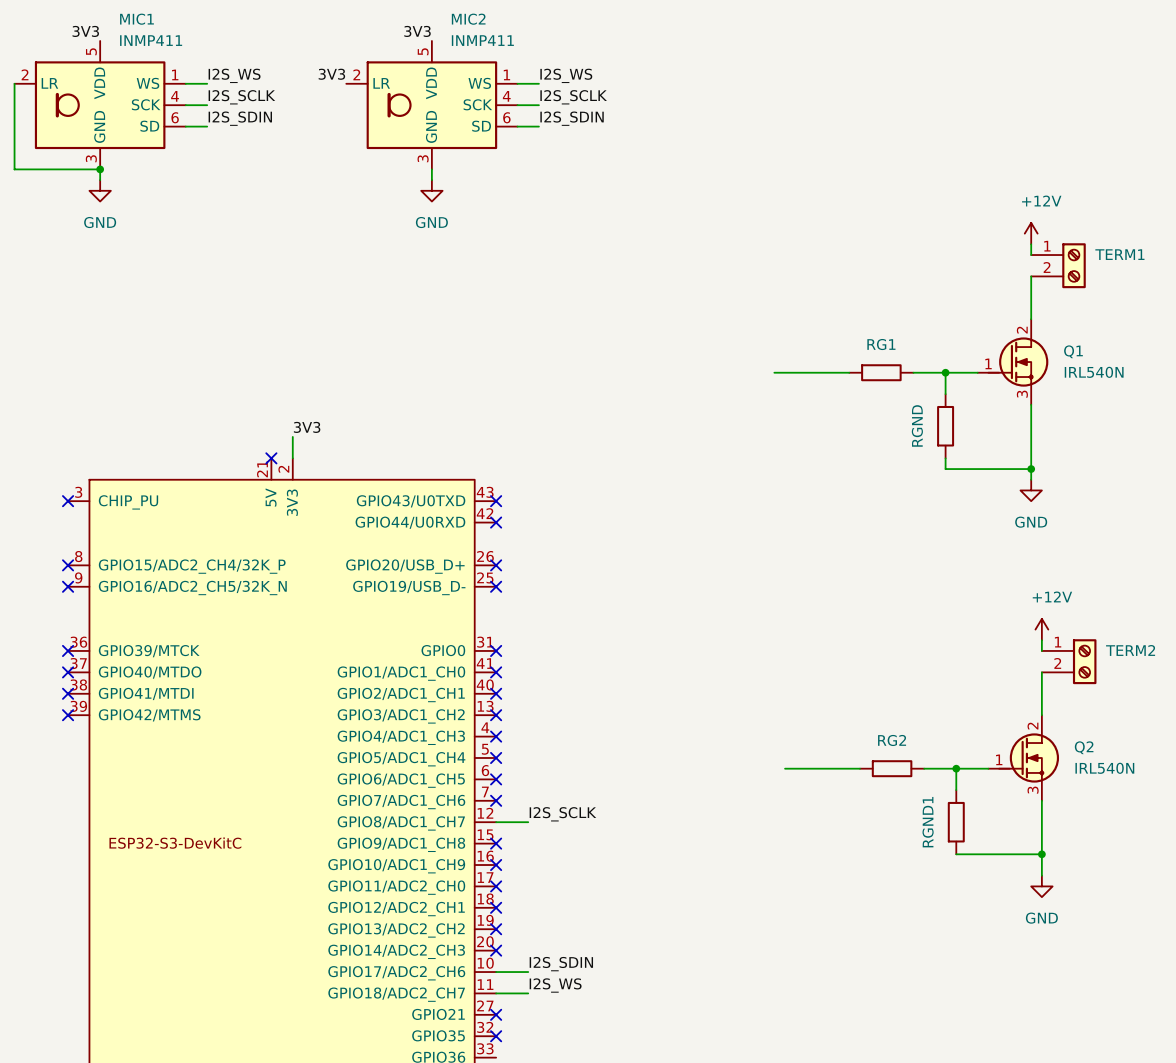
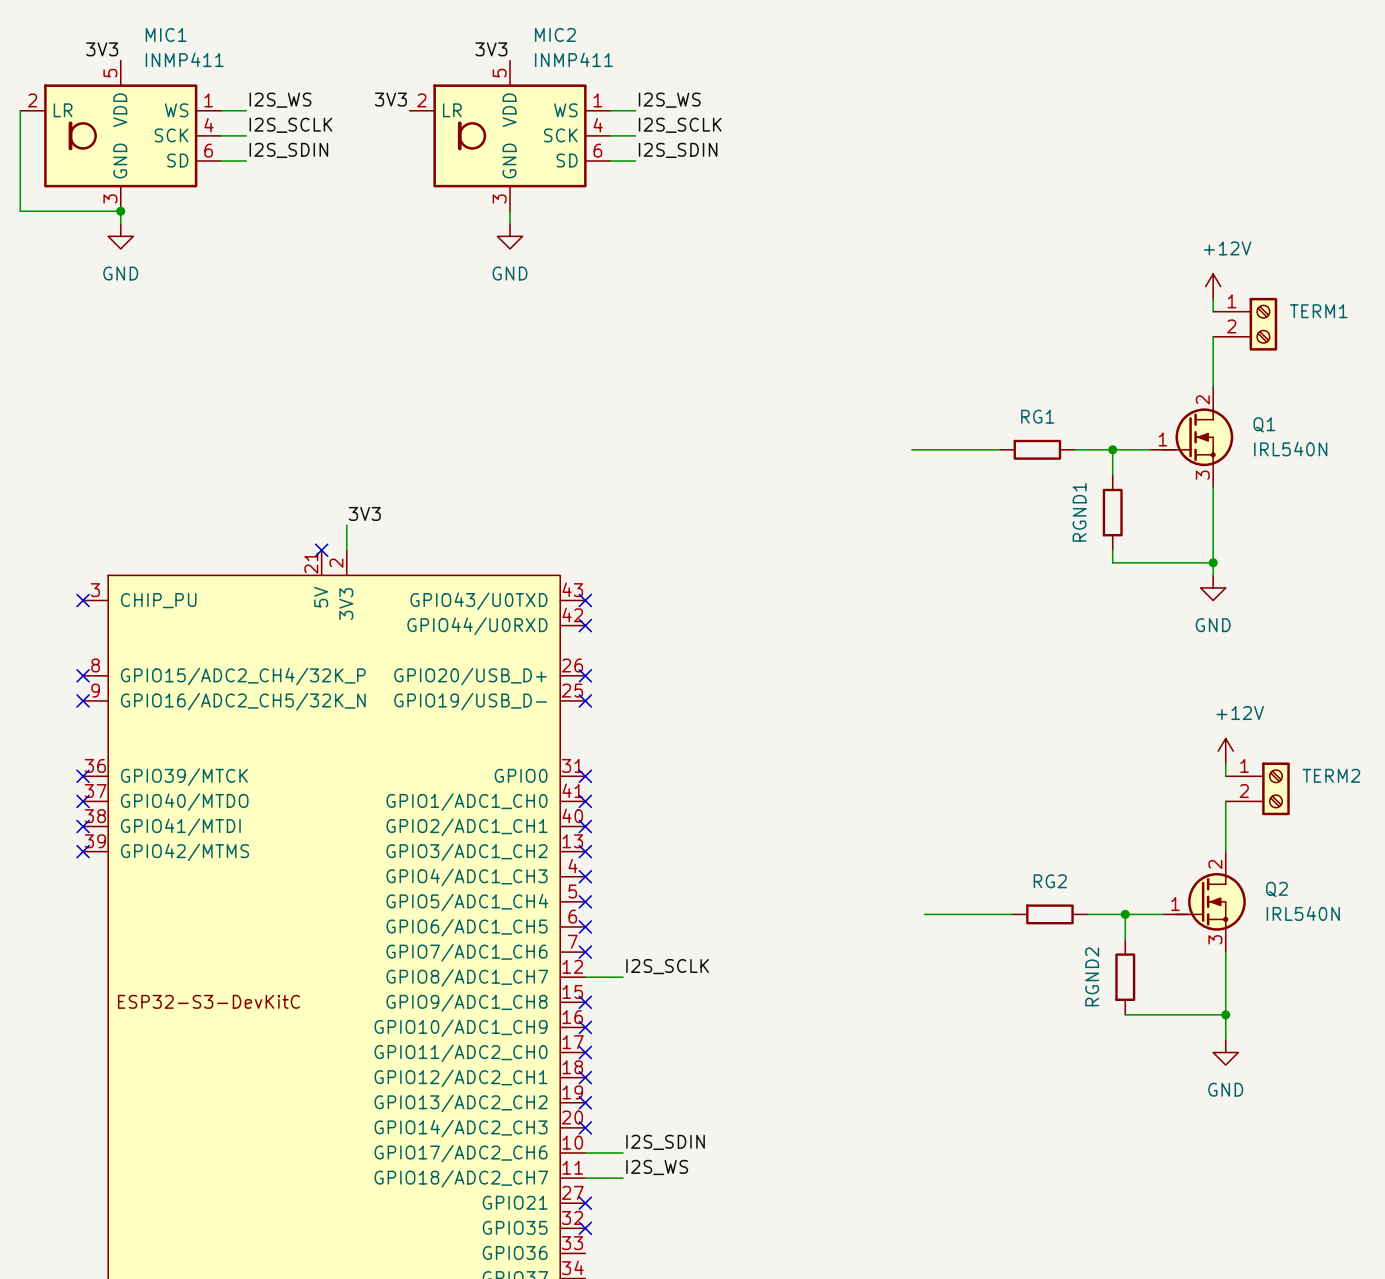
RGND name: RGND (917, 425) -> RGND1 (1079, 512)
RGND1 name: RGND1 (928, 822) -> RGND2 (1092, 976)

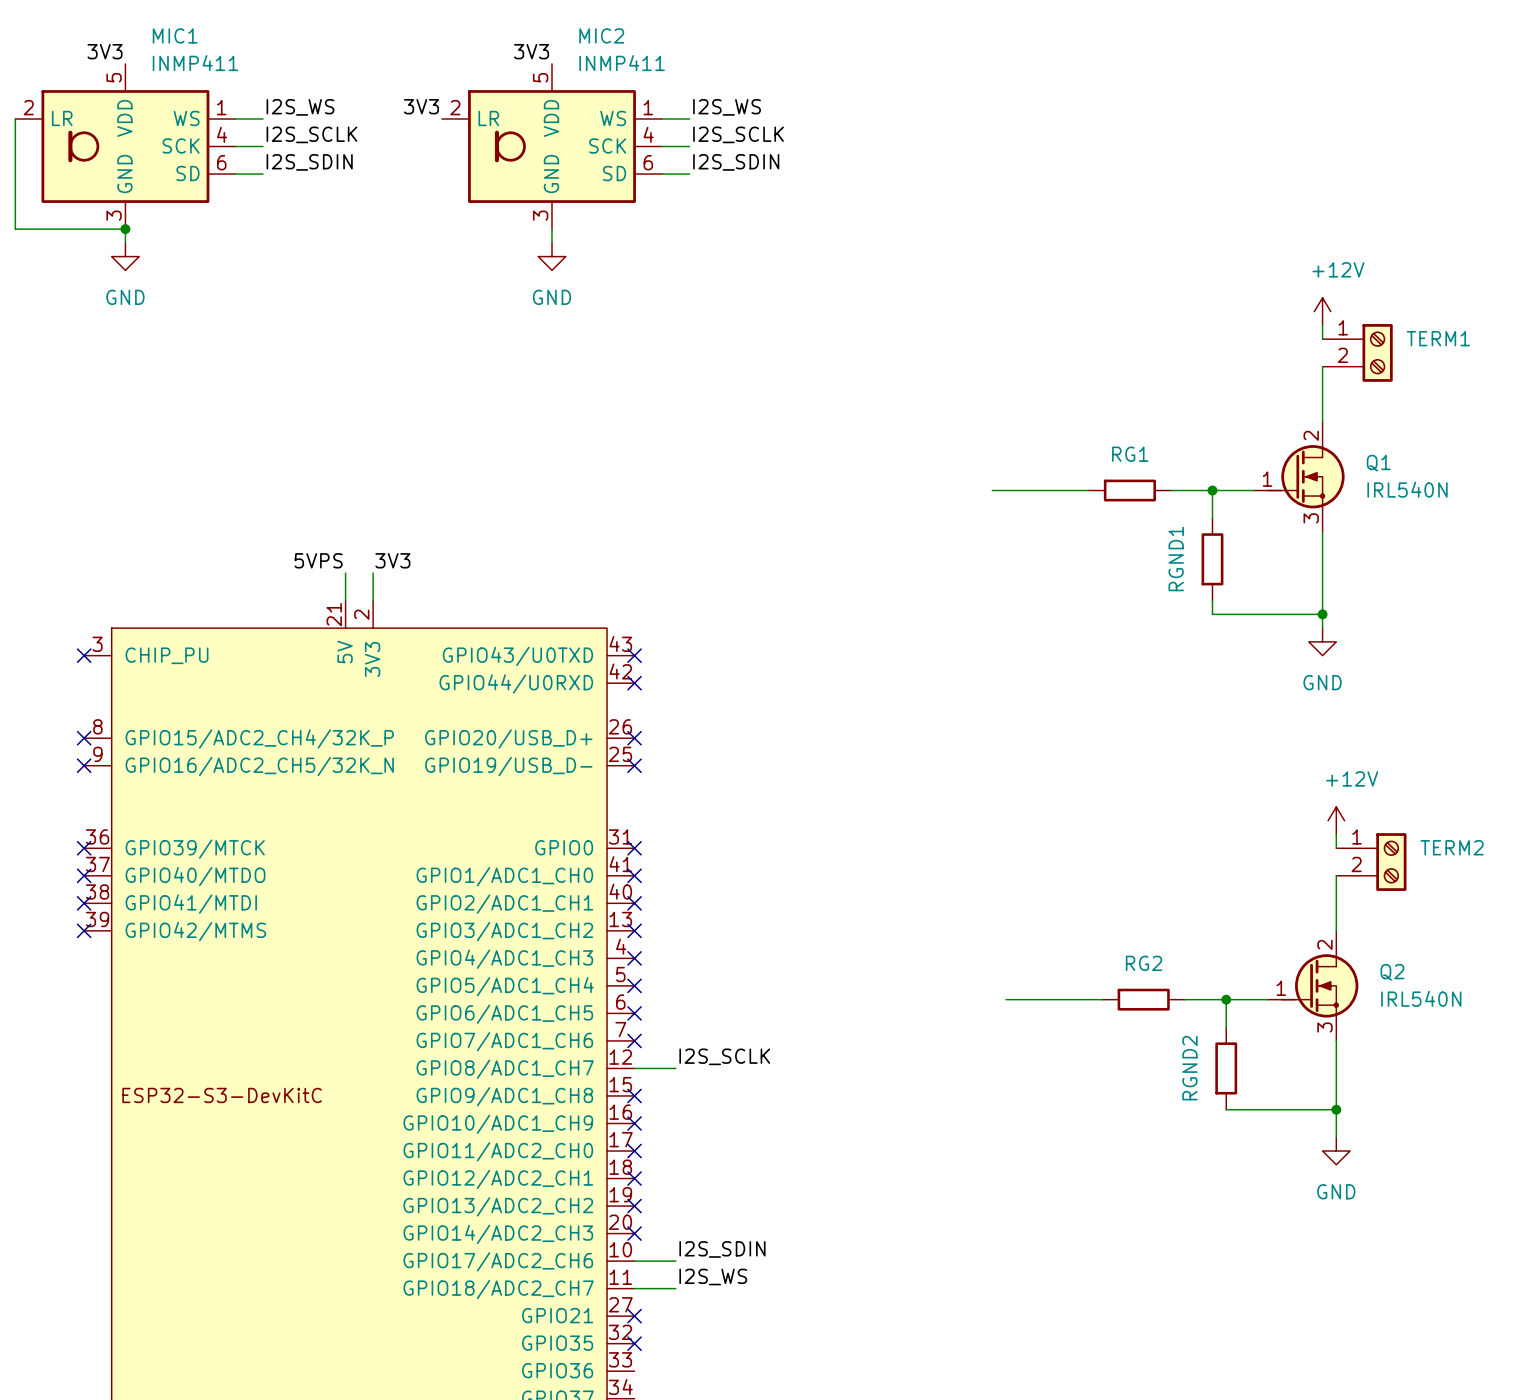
label: none -> 5VPS (318, 560)
wire: none -> (345, 573) (345, 600)
no-connect mark: (321, 550) -> none

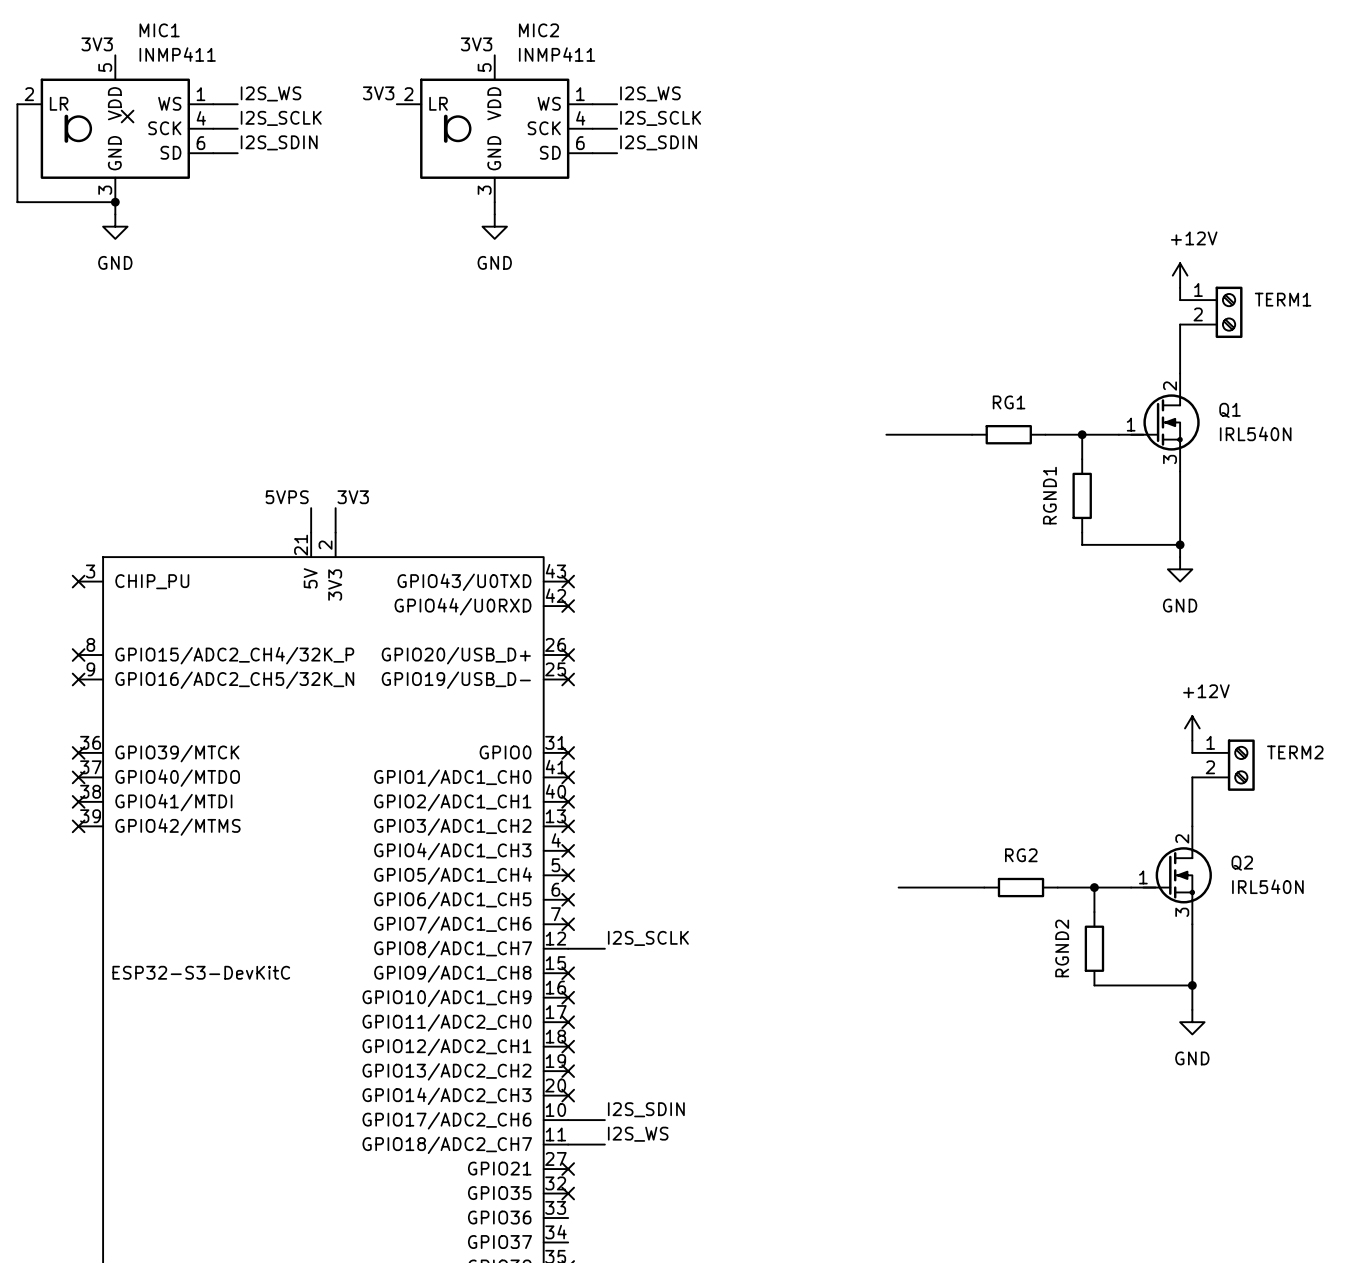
no-connect mark: none -> (127, 116)

